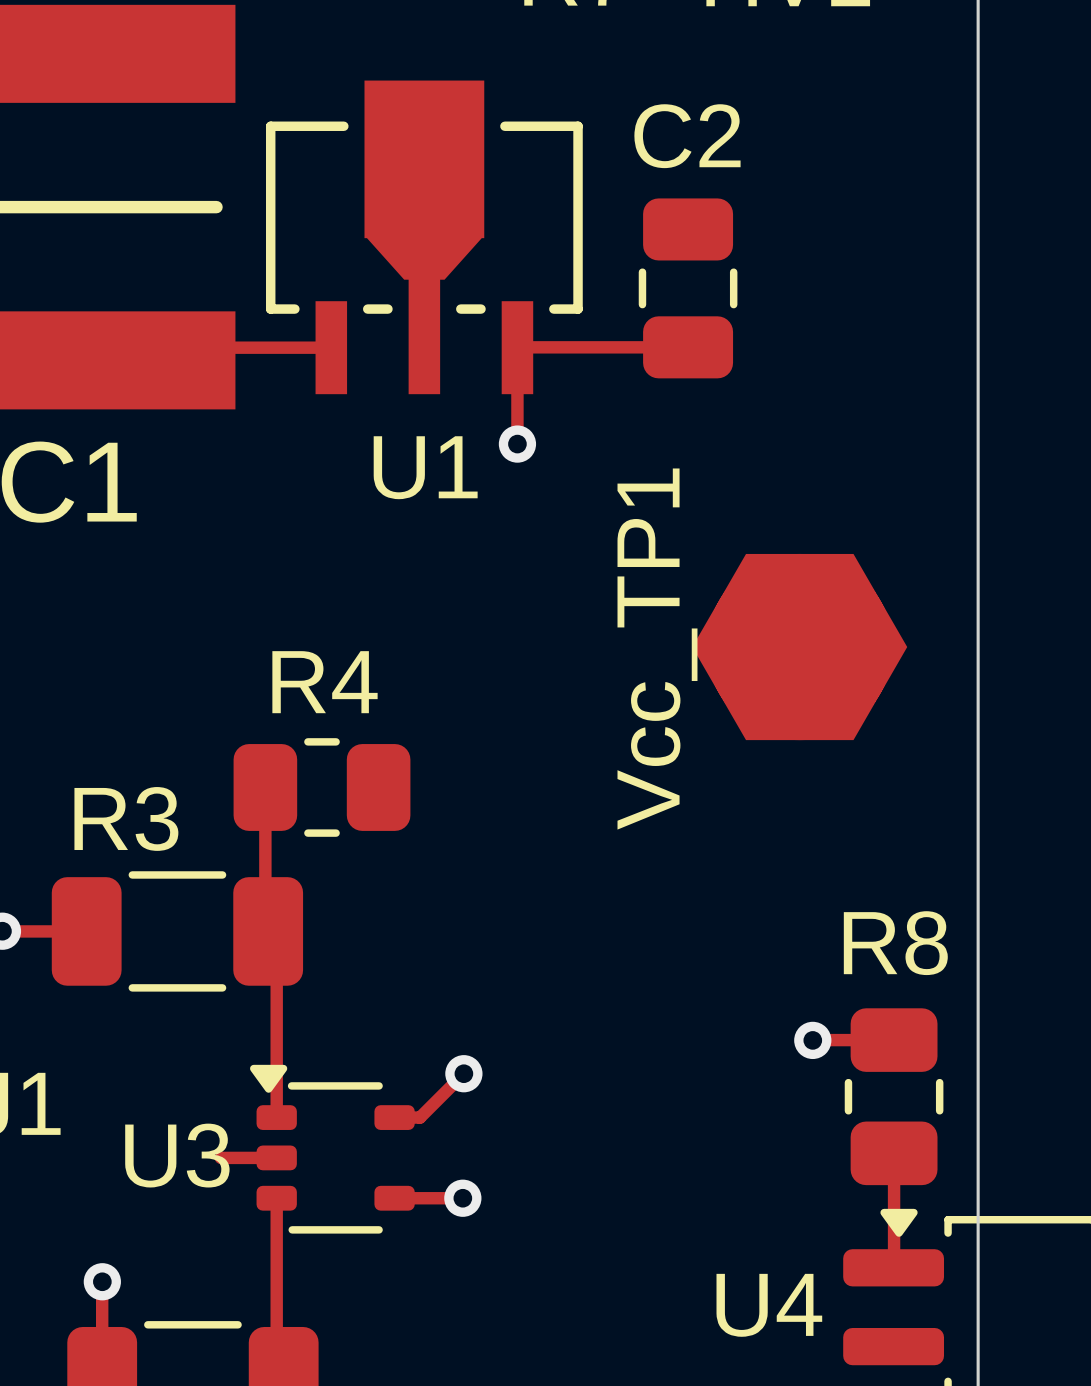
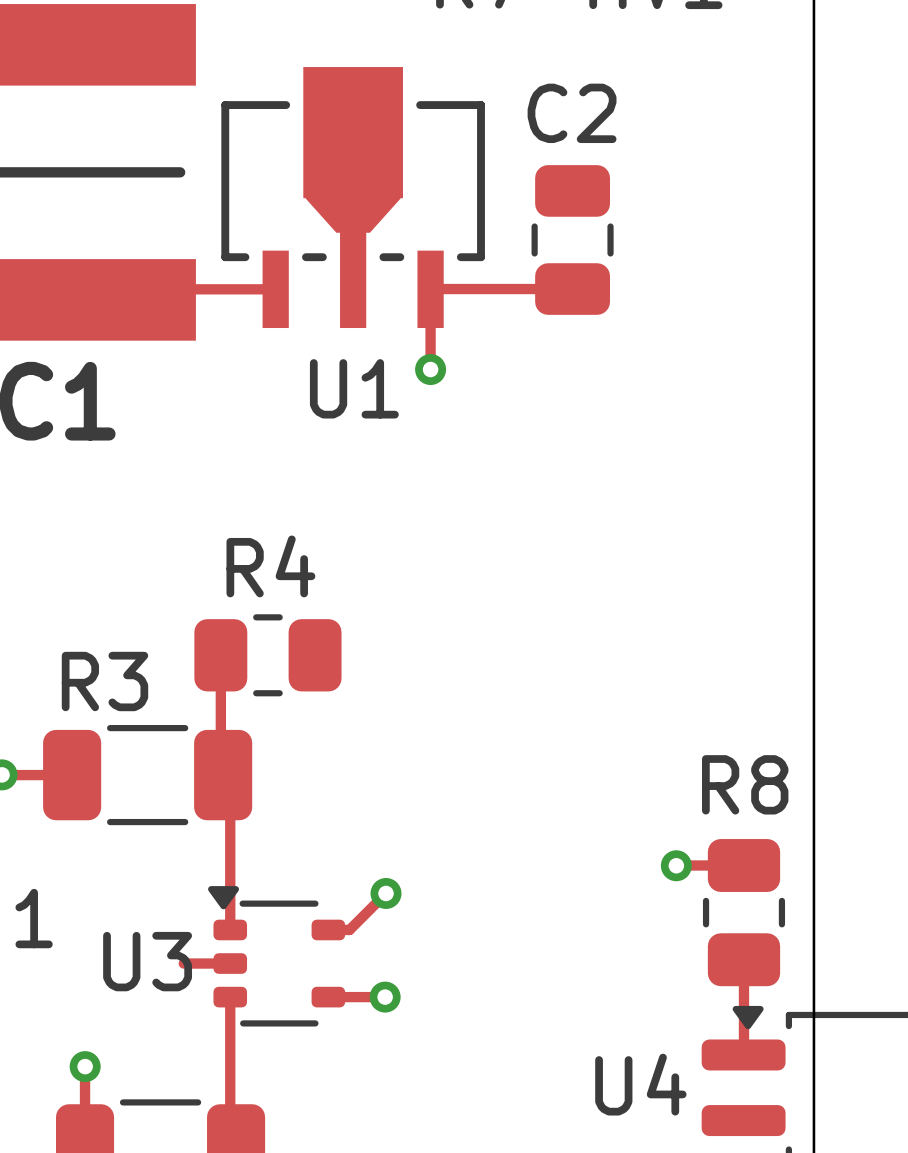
Vcc_TP1: (799, 647) -> none

